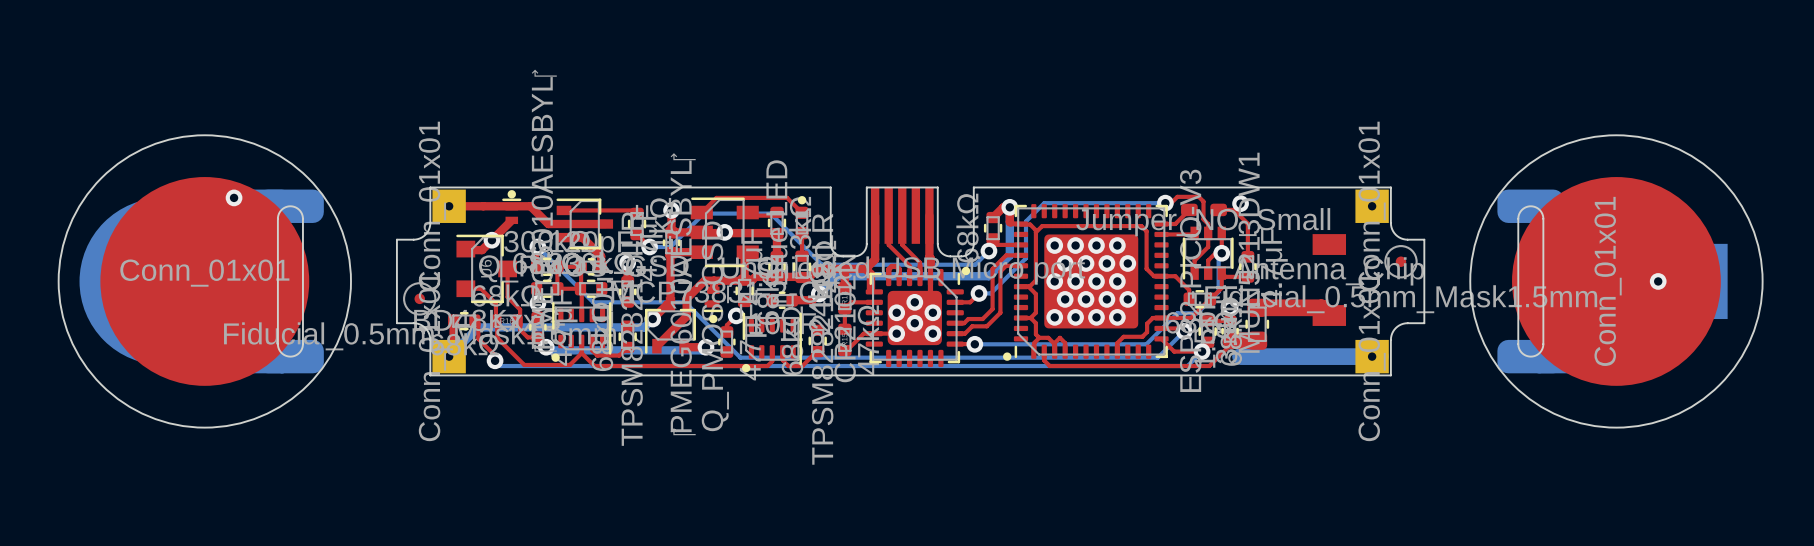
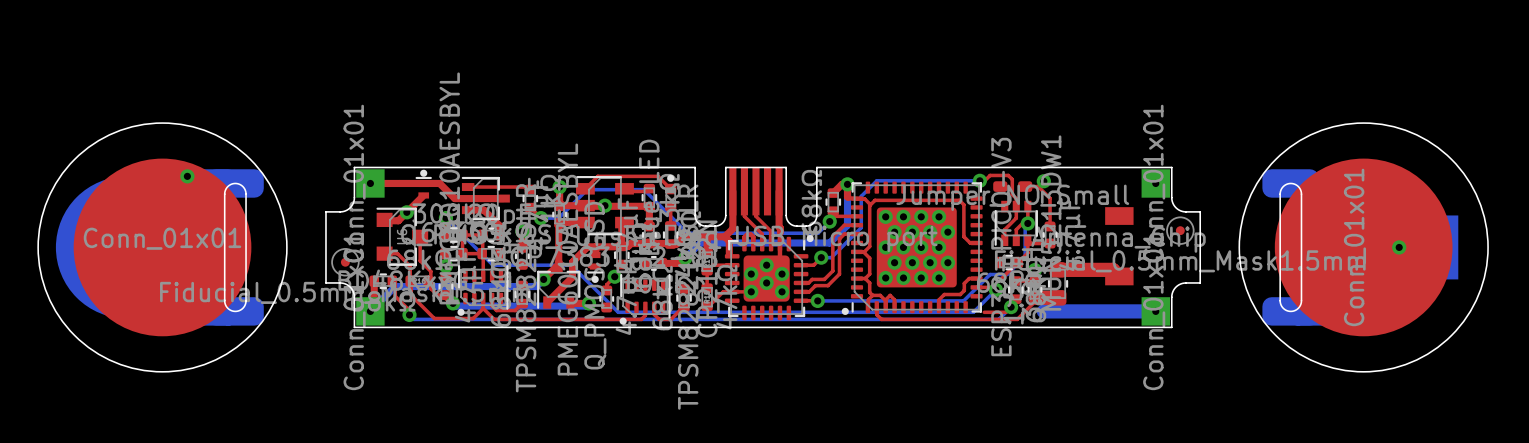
top track: (1189, 209) (1175, 224) (1161, 224) -> none
top track: (1161, 234) (1193, 234) -> none
top track: (1161, 276) (1175, 276) (1189, 290) (1189, 295) -> none
top track: (1161, 317) (1191, 317) -> none
top track: (1161, 338) (1174, 351) (1202, 351) -> (984, 312) (1005, 312) (1011, 307)

